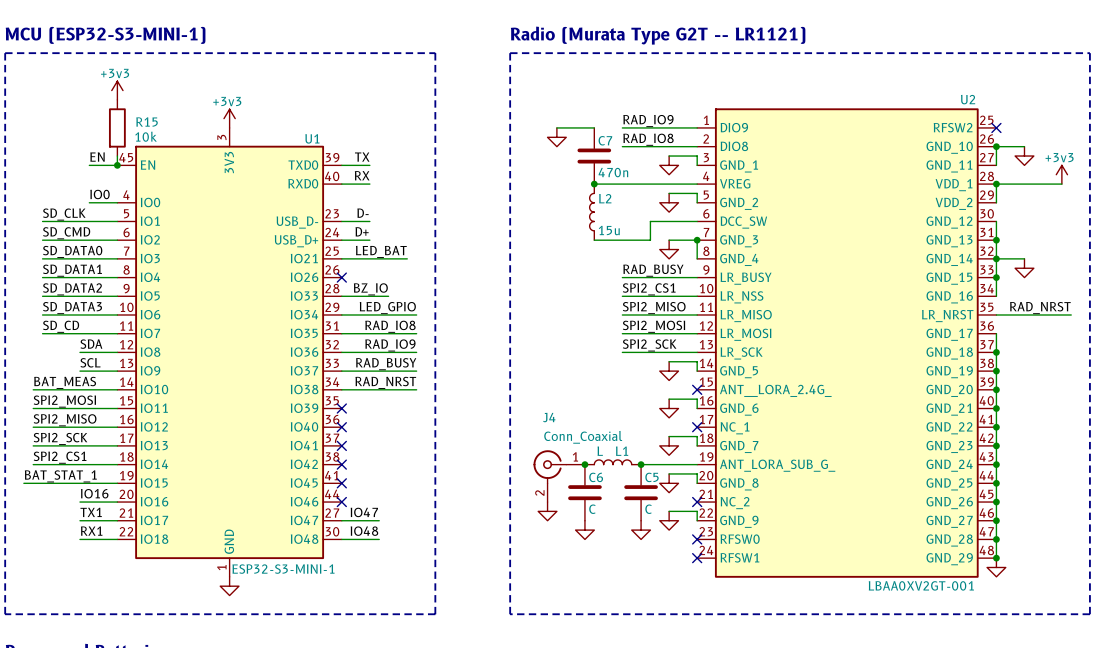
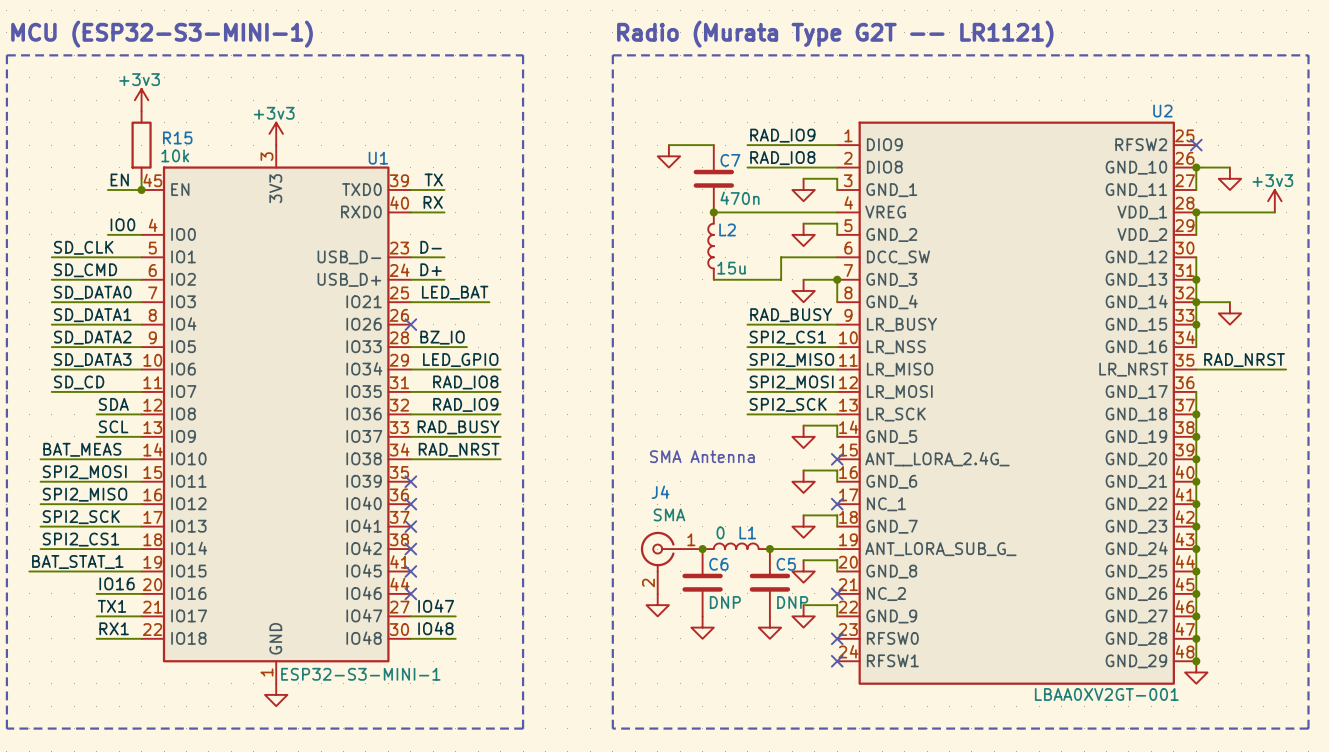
text: none -> SMA Antenna (702, 456)
J4 value: Conn_Coaxial (583, 437) -> SMA (669, 514)
L1 value: L (600, 451) -> 0 (720, 532)
C6 value: C (592, 509) -> DNP (725, 602)
C5 value: C (648, 509) -> DNP (792, 602)

